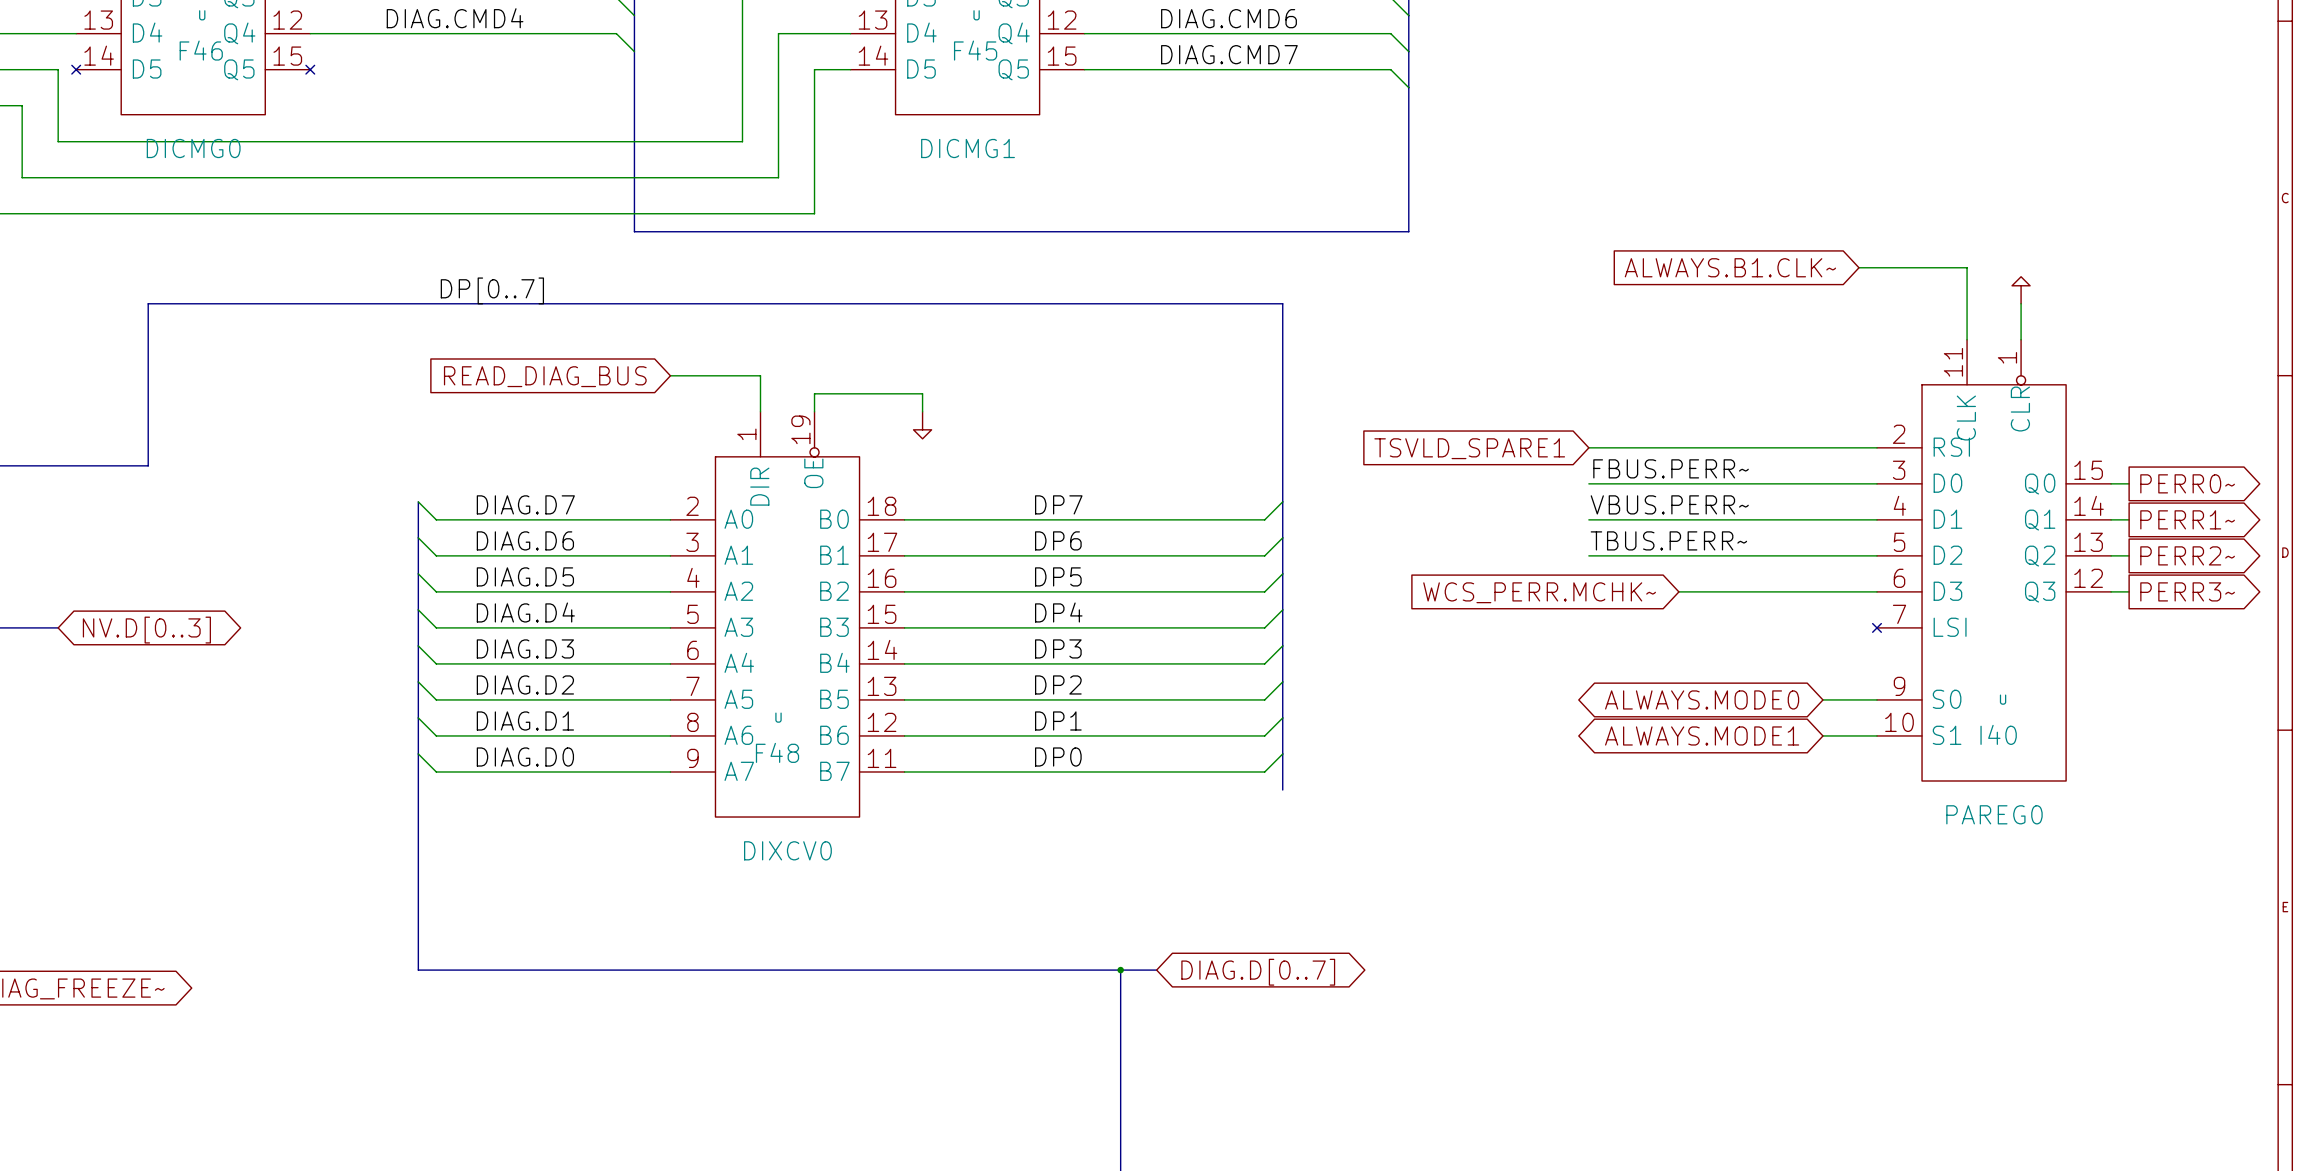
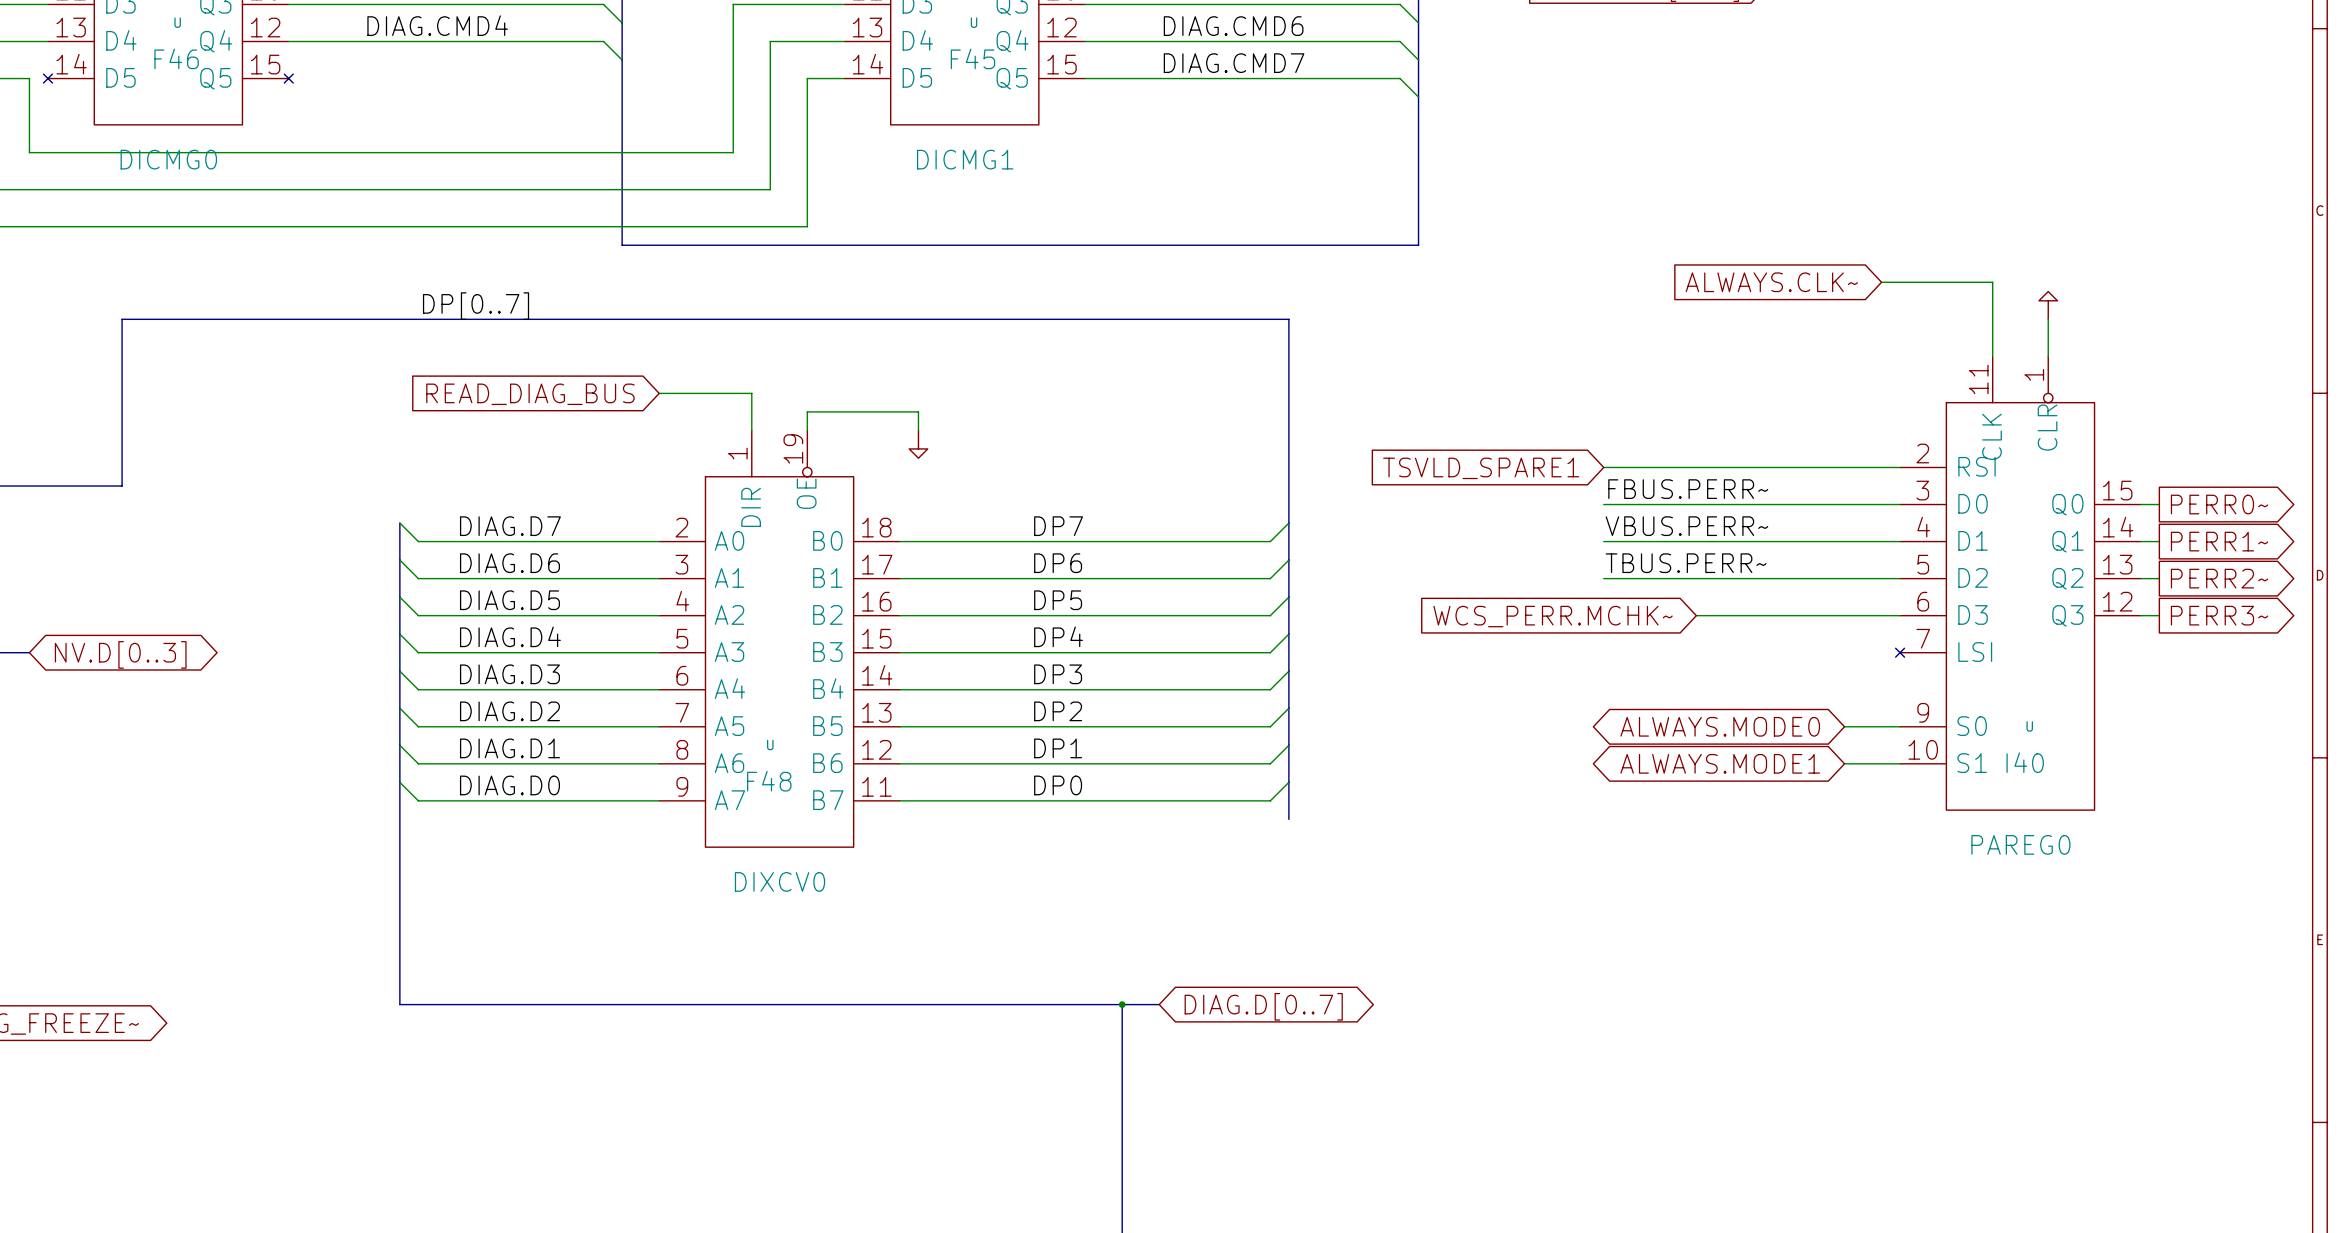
global label: ALWAYS.B1.CLK~ (1730, 267) -> ALWAYS.CLK~ (1771, 282)

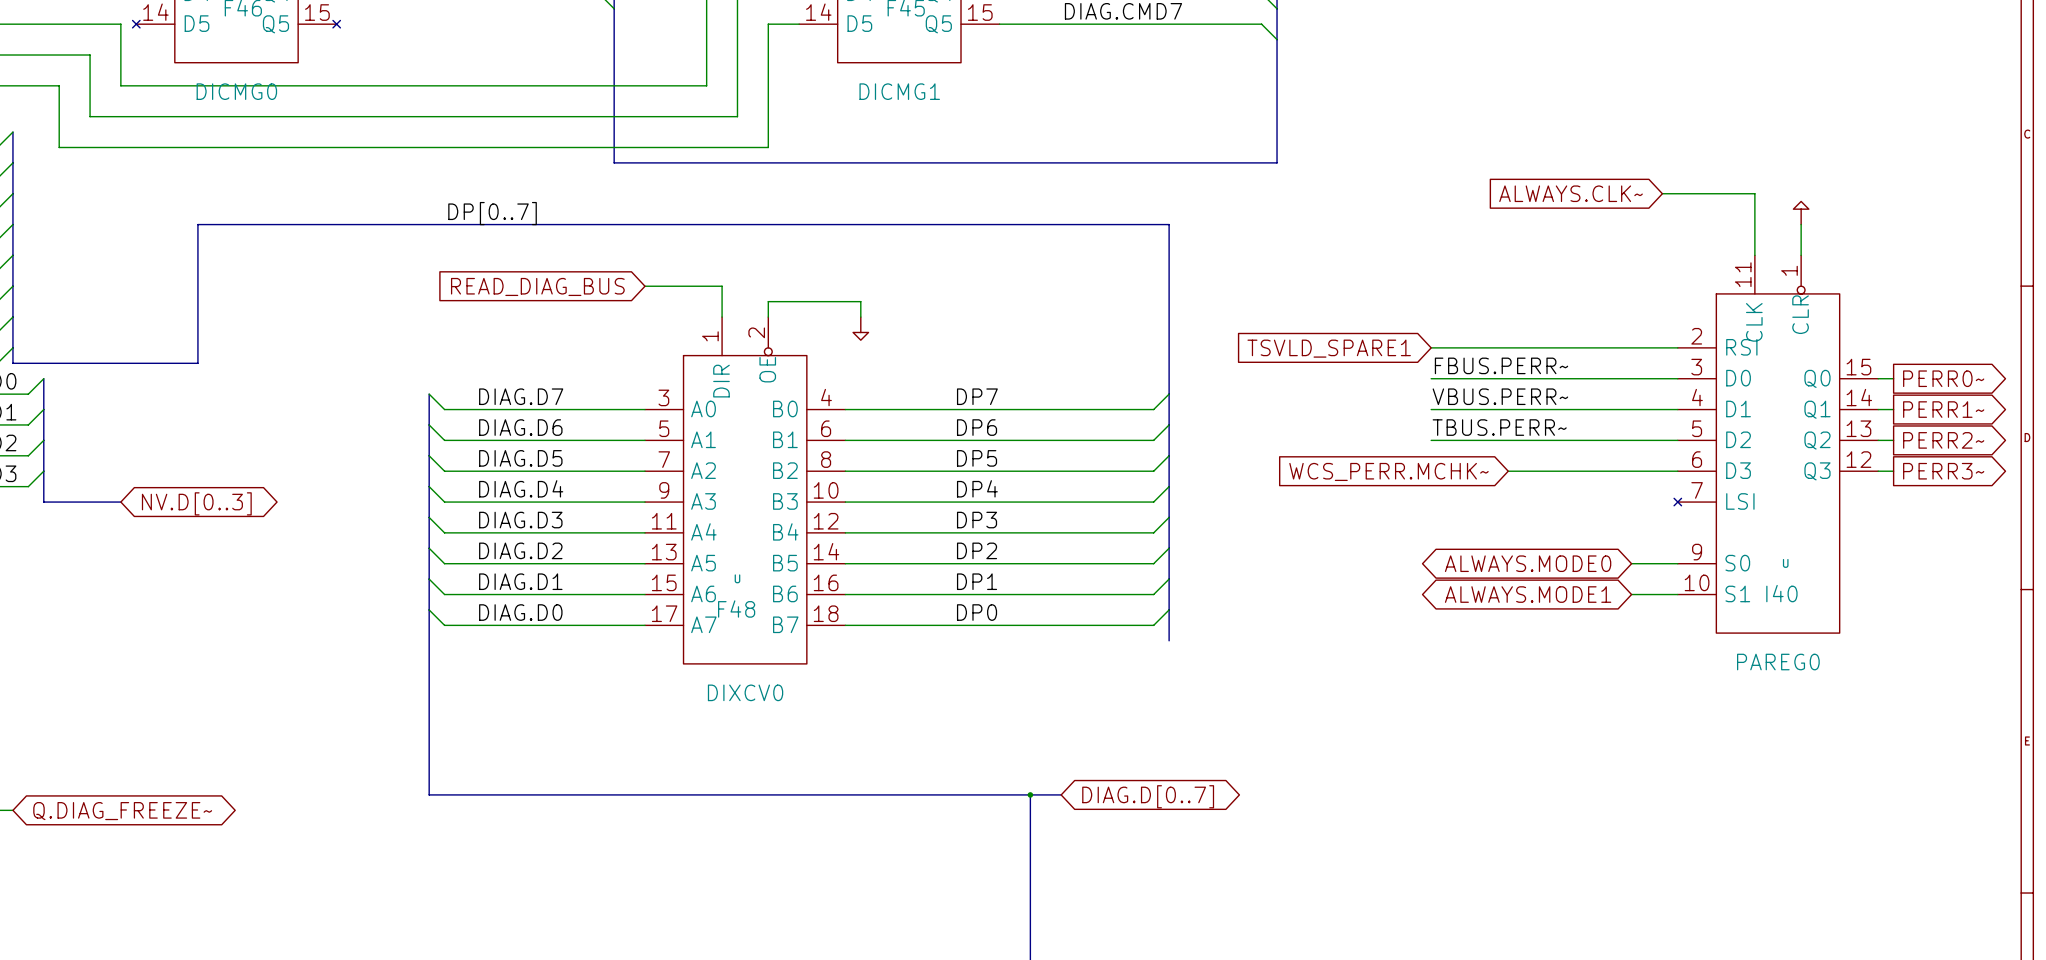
U symbol: [659, 430, 900, 848] -> [644, 317, 846, 664]

